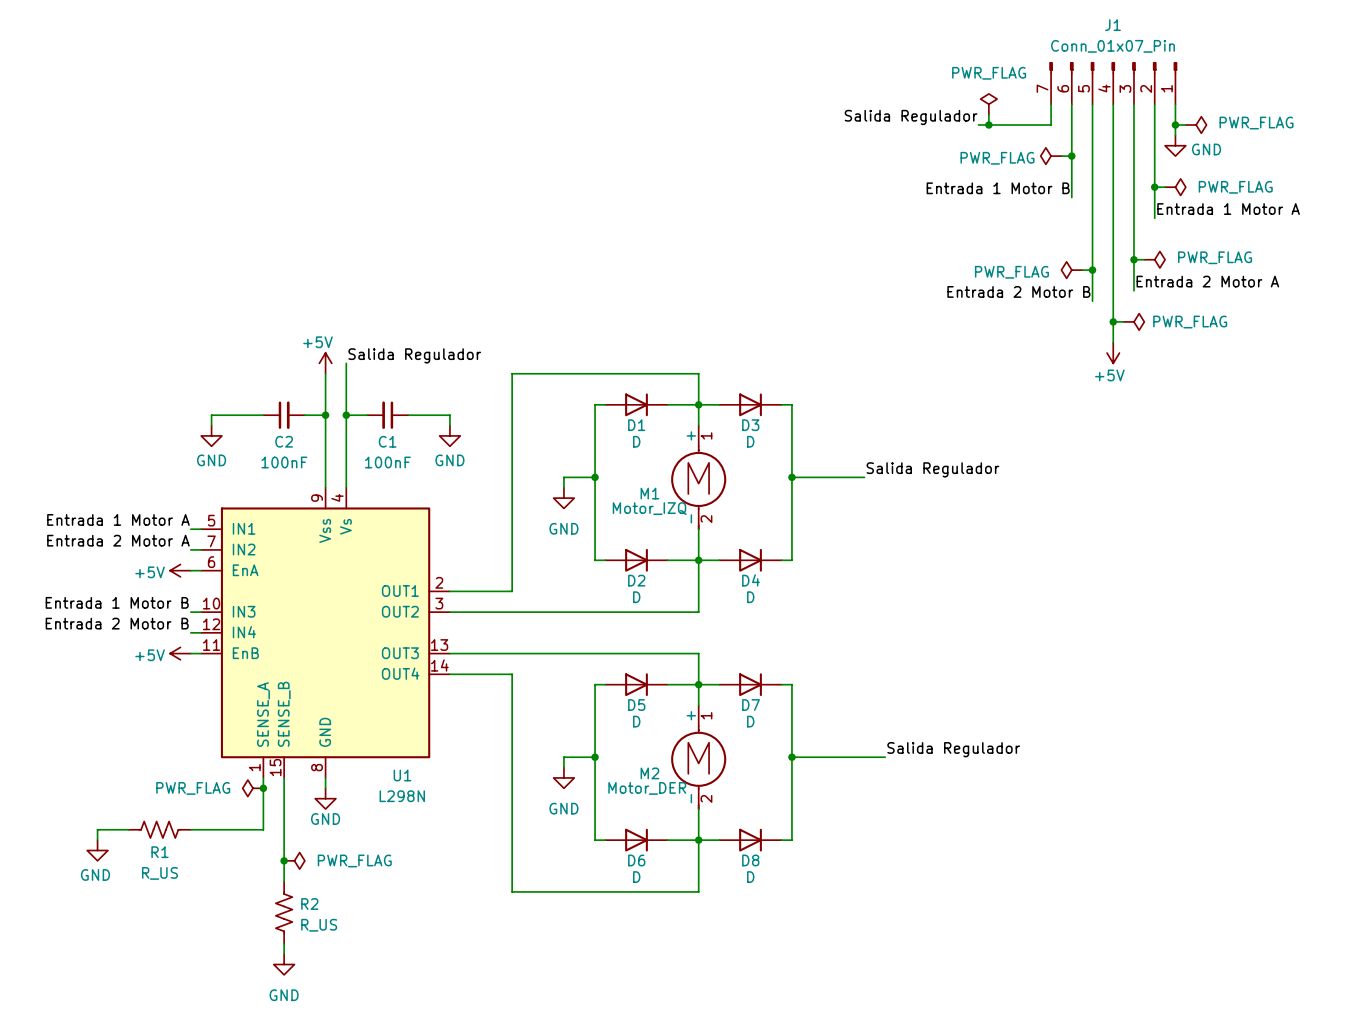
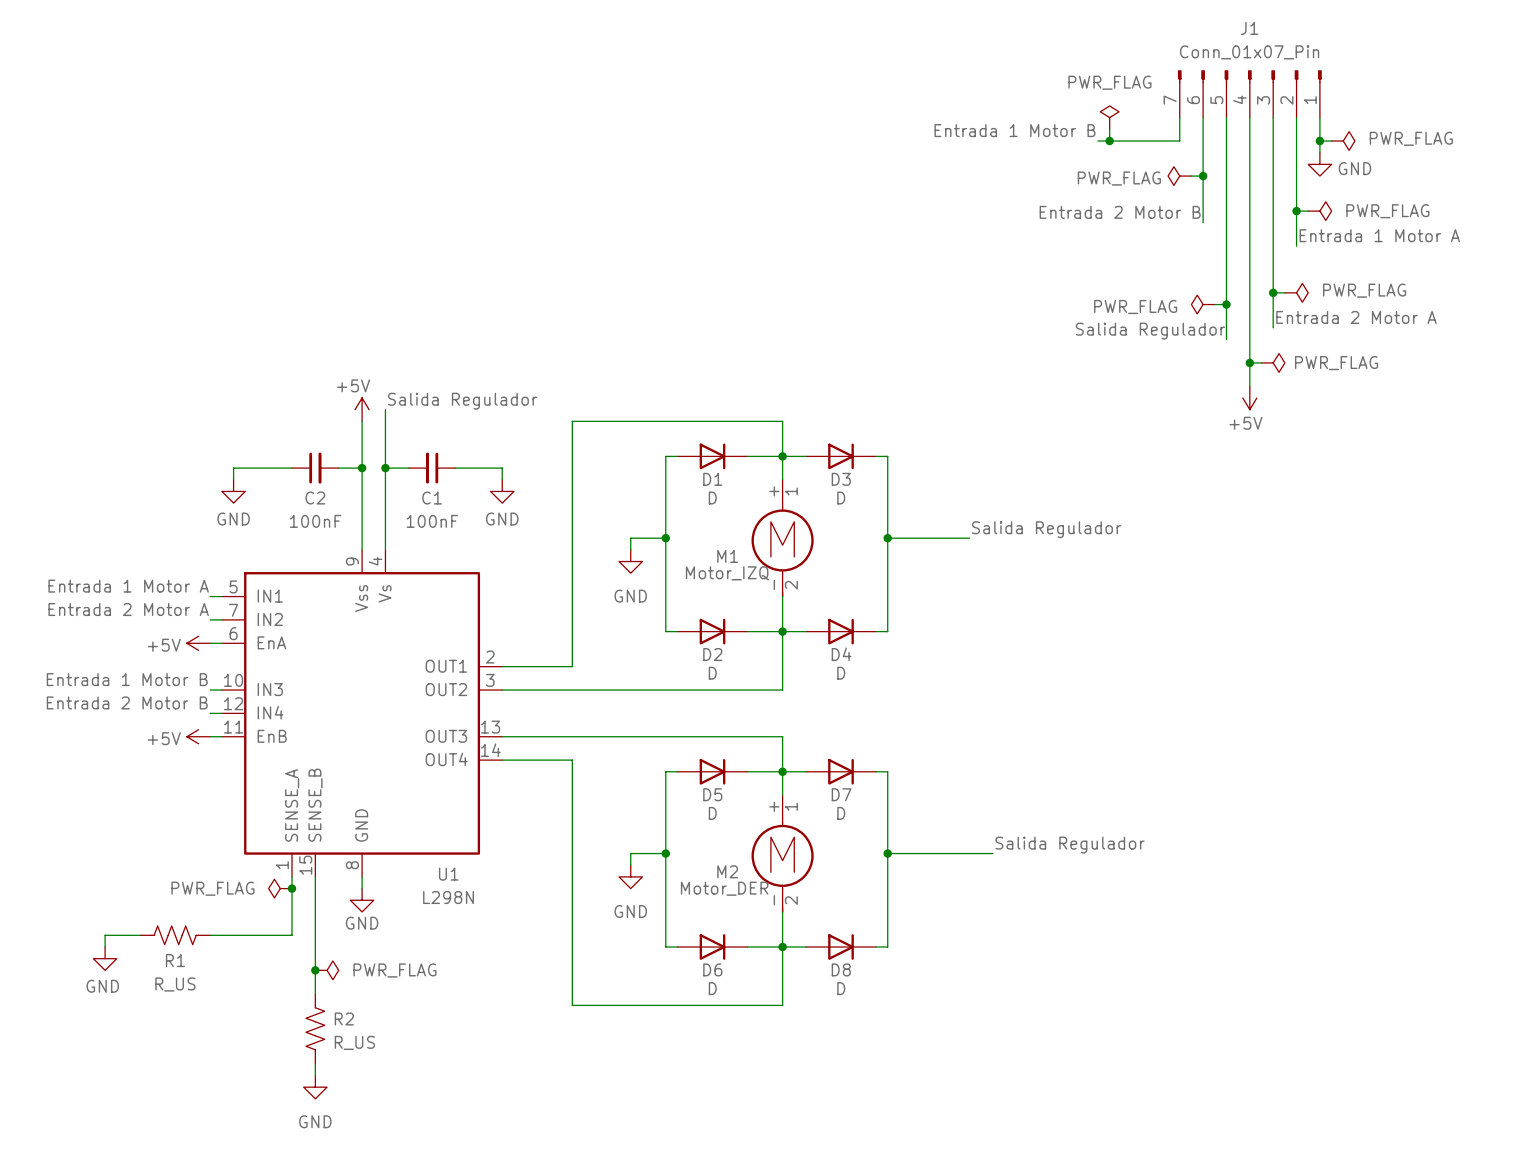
label: Salida Regulador (911, 117) -> Entrada 1 Motor B (1015, 130)
label: Entrada 1 Motor B (998, 188) -> Entrada 2 Motor B (1120, 212)
label: Entrada 2 Motor B (1018, 291) -> Salida Regulador (1150, 331)

